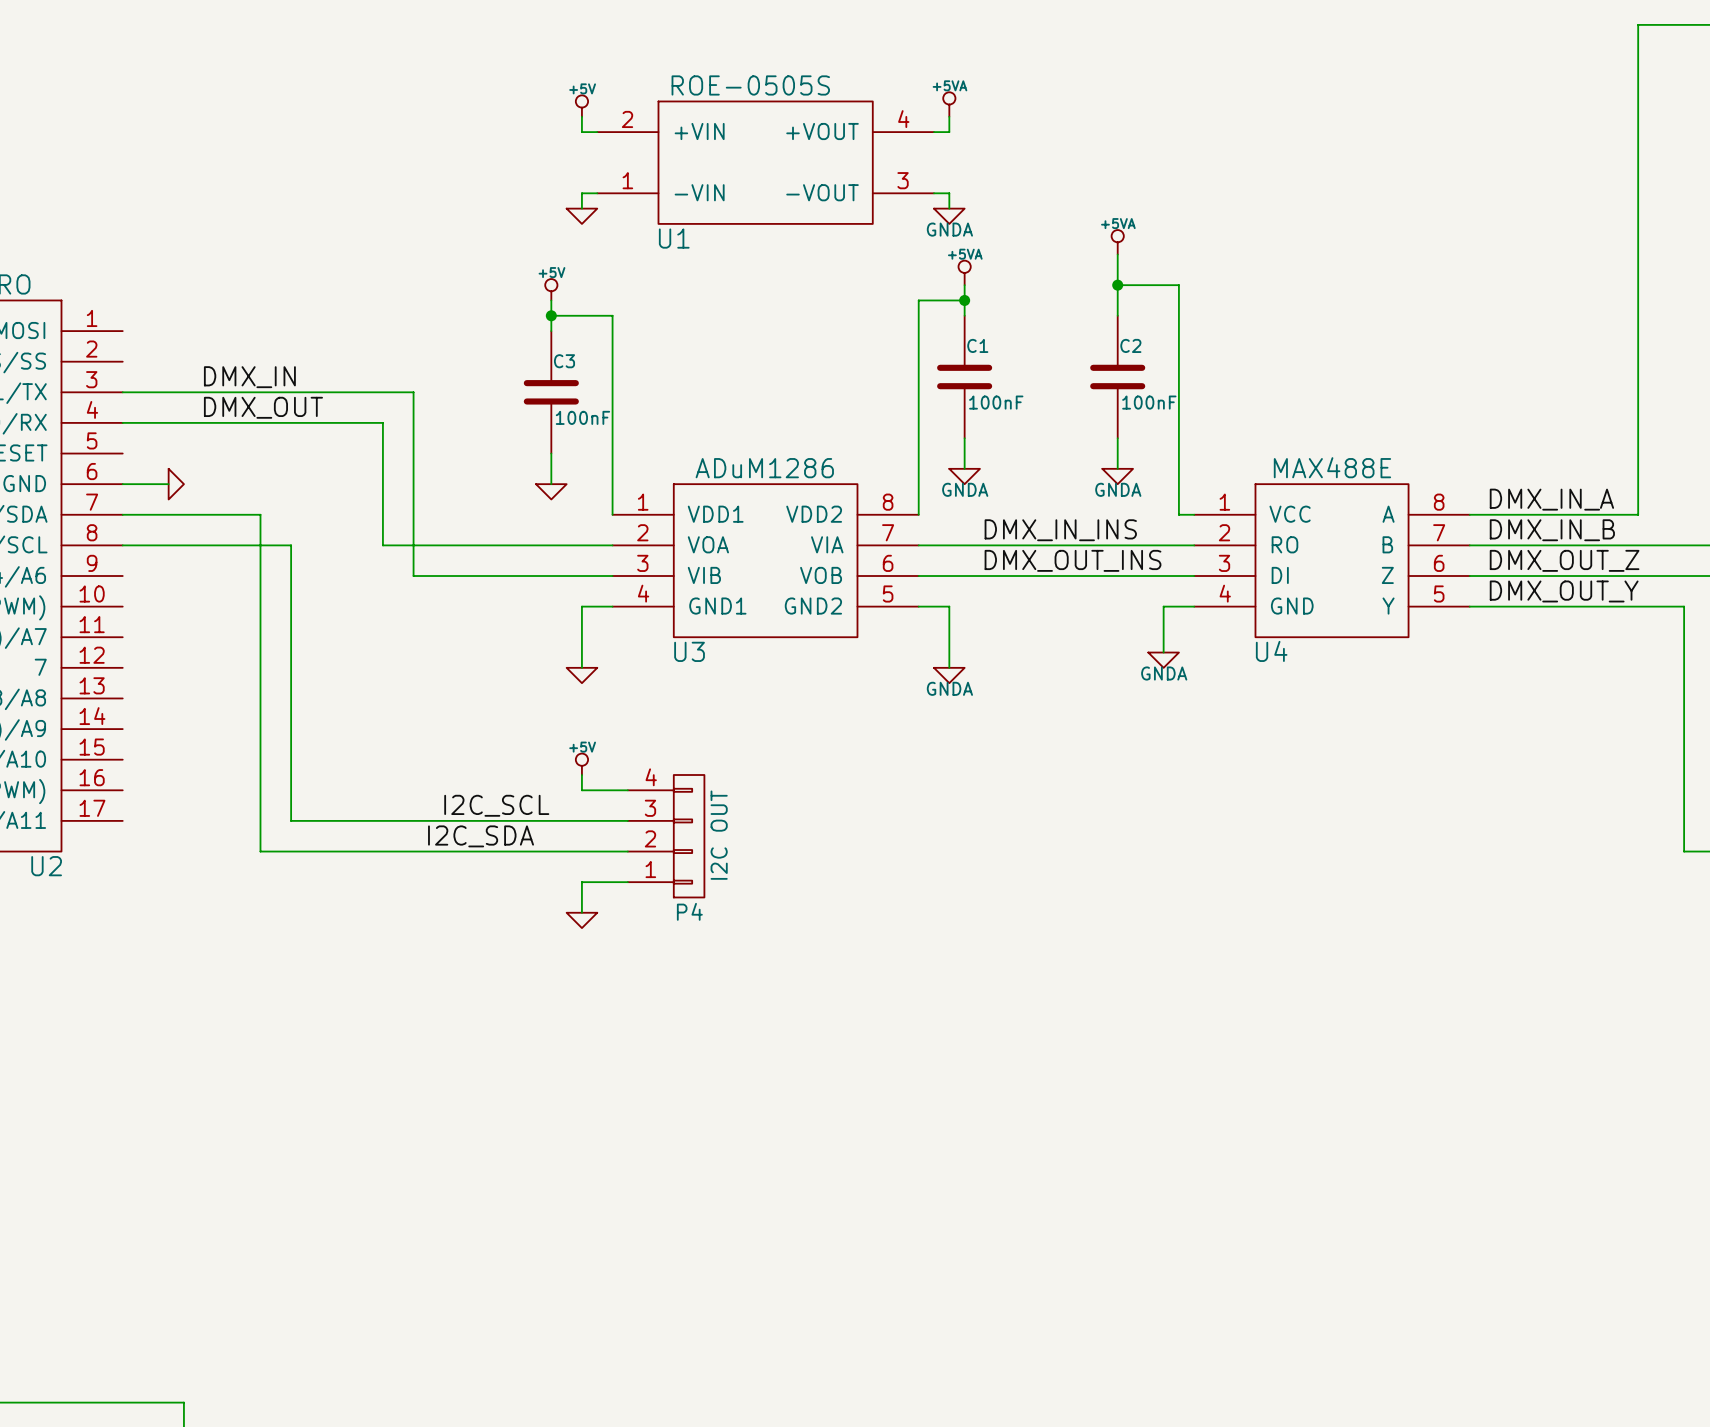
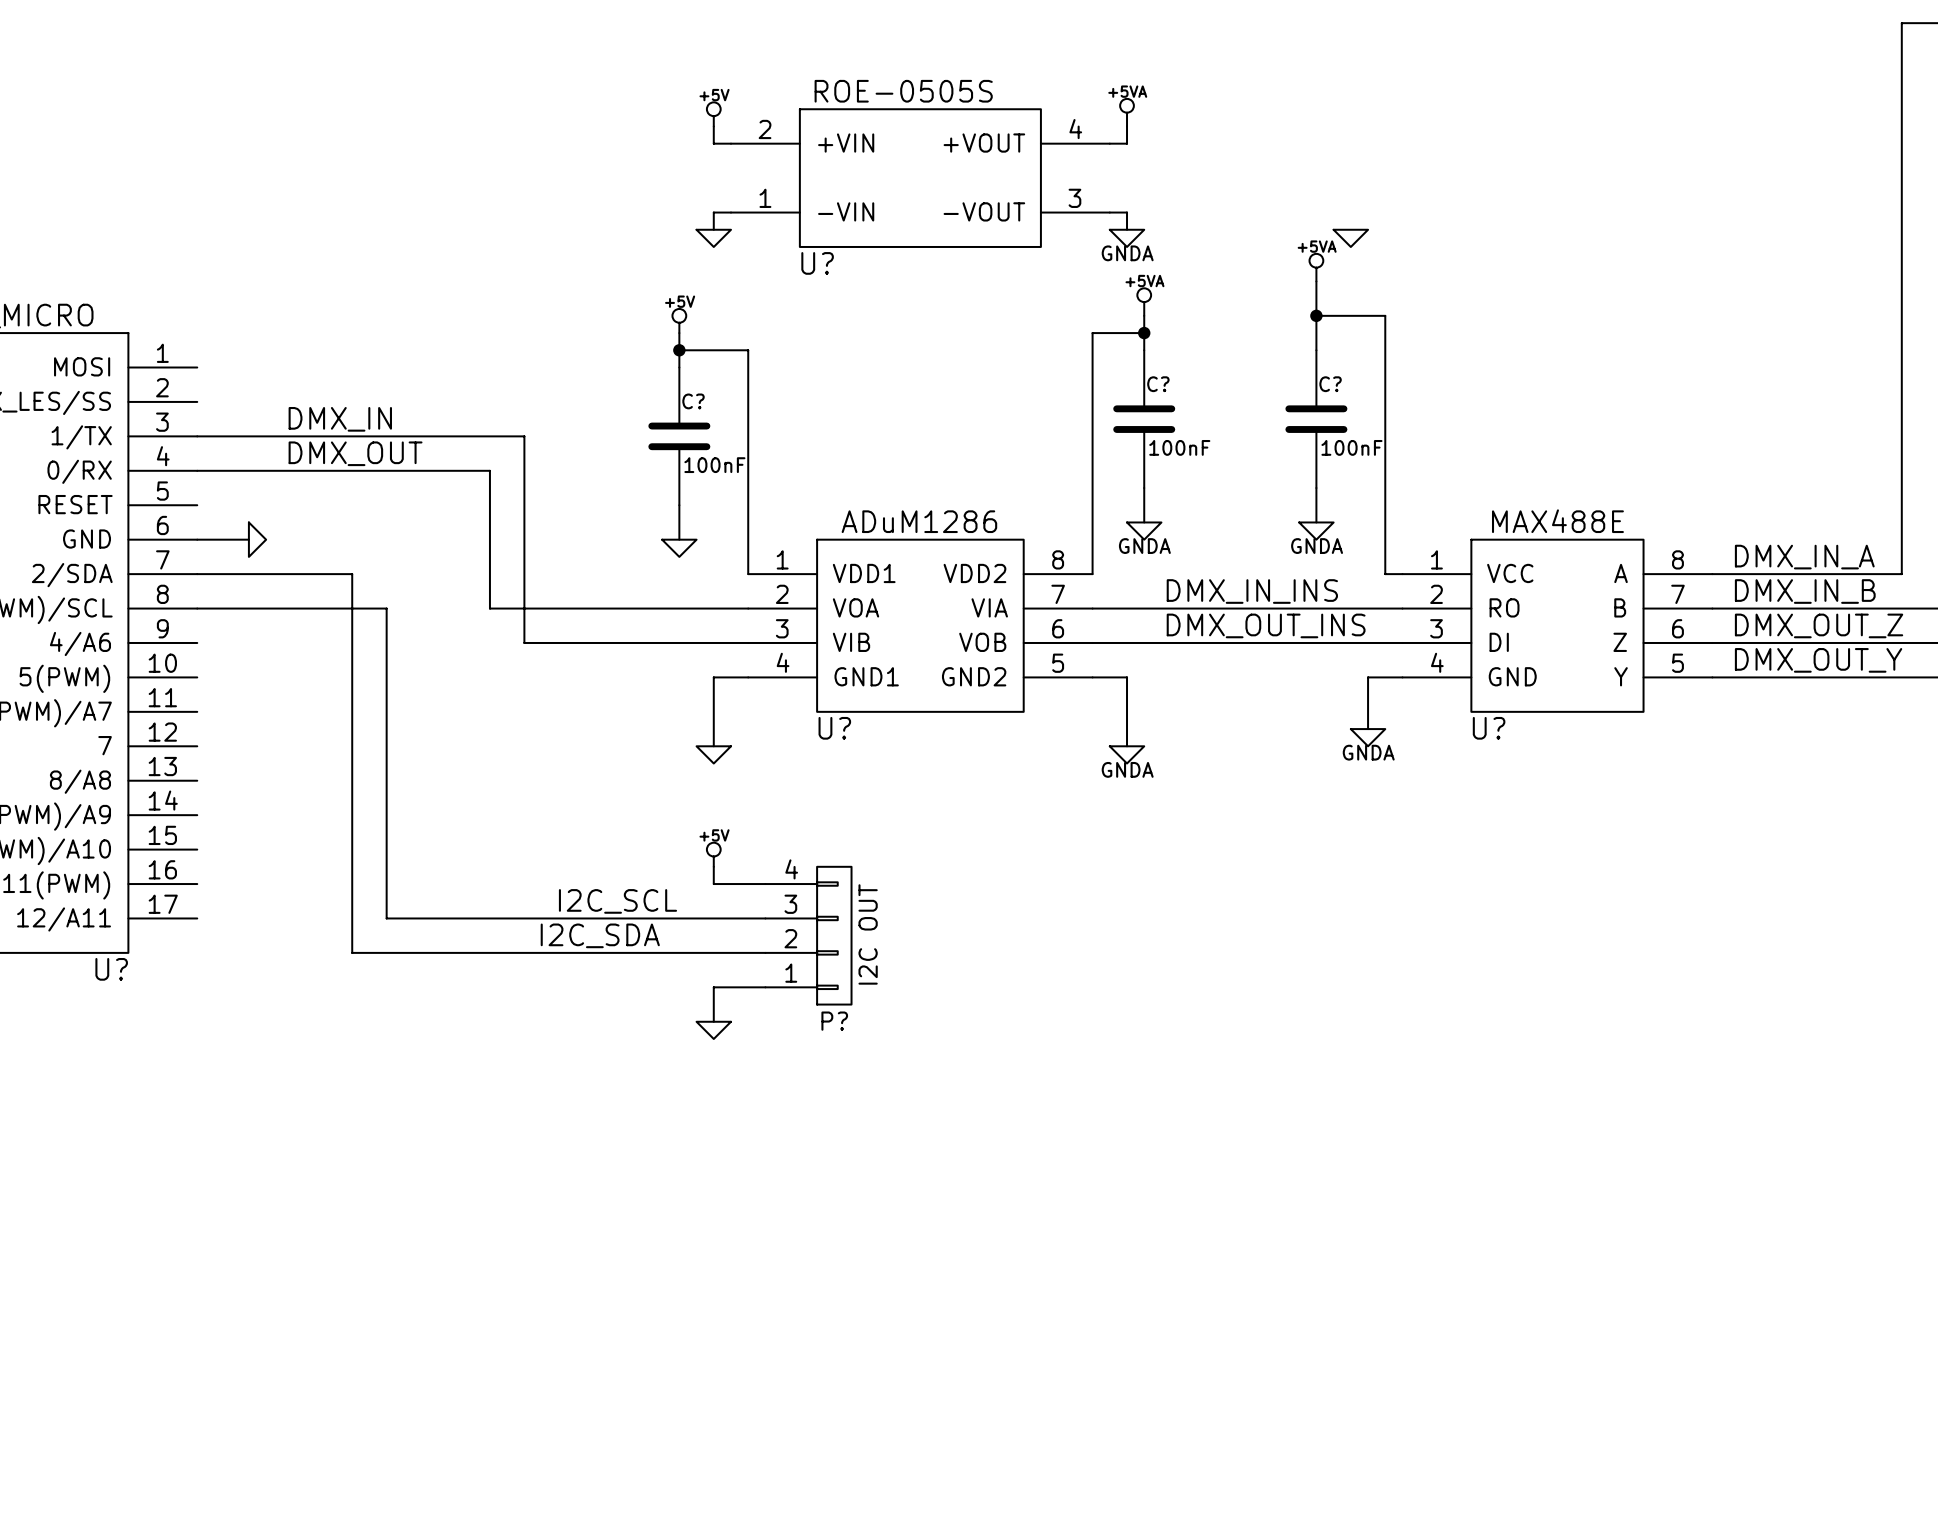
power symbol: none -> (1350, 238)
U1 name: U1 (674, 238) -> U? (817, 263)
C1 name: C1 (977, 345) -> C? (1158, 384)
C2 name: C2 (1130, 345) -> C? (1330, 384)
C3 name: C3 (564, 361) -> C? (693, 401)
U3 name: U3 (689, 651) -> U? (834, 728)
U4 name: U4 (1271, 651) -> U? (1489, 728)
U2 name: U2 (46, 866) -> U? (111, 969)
P4 name: P4 (689, 911) -> P? (834, 1021)

